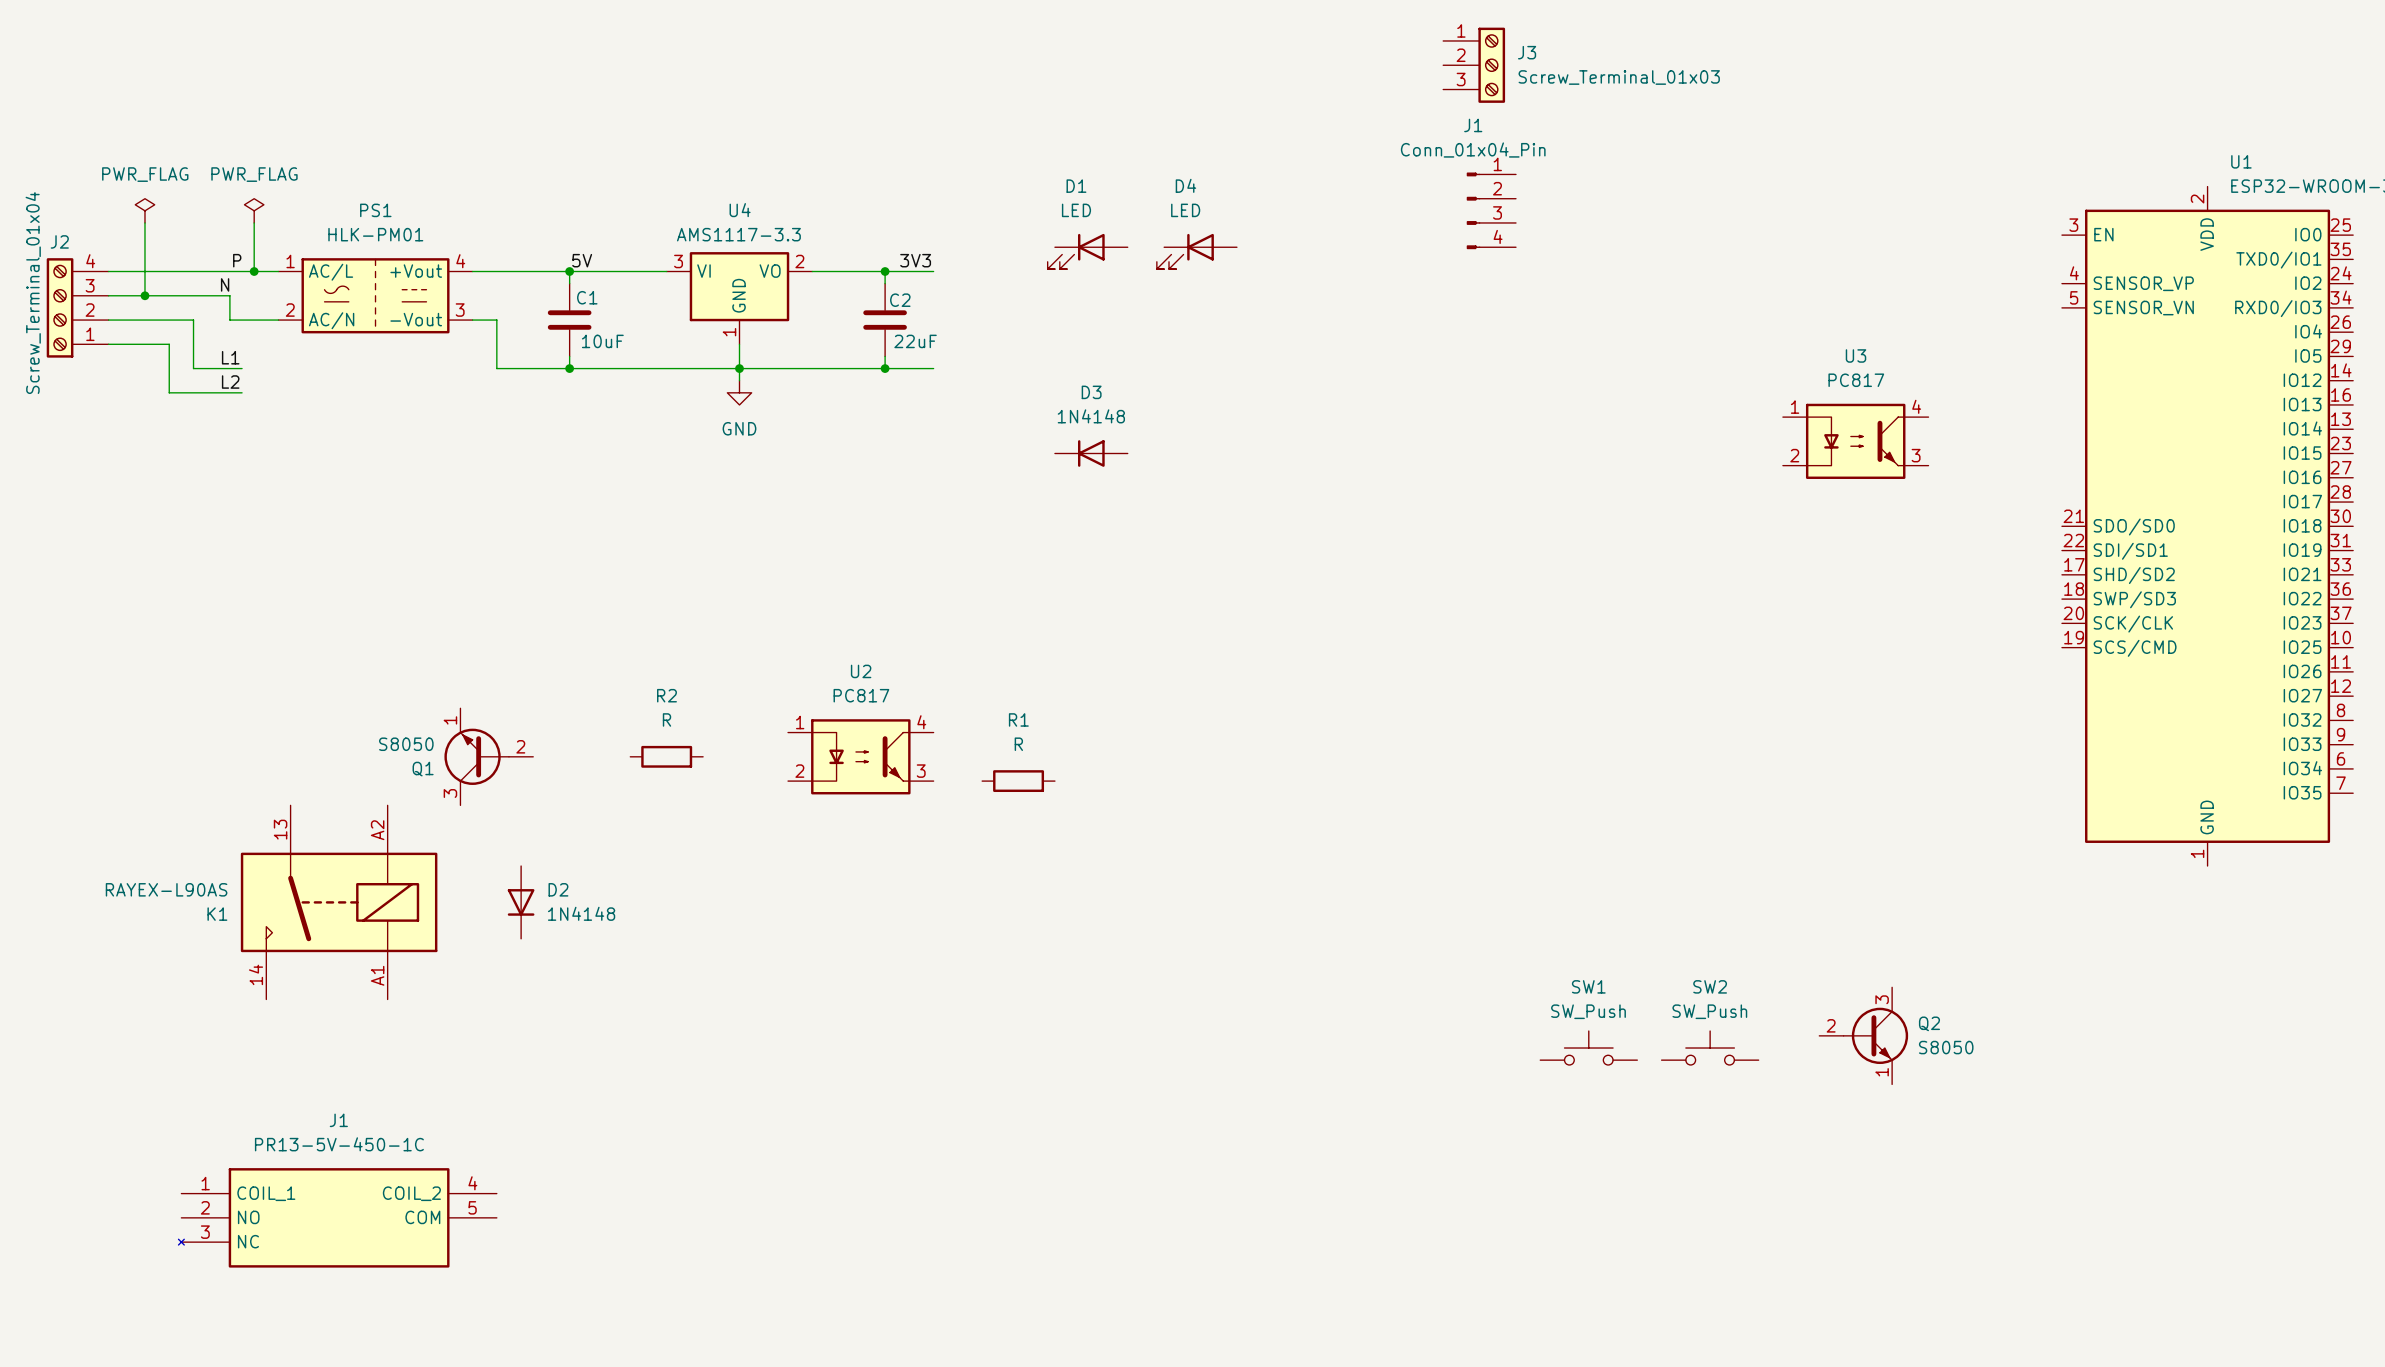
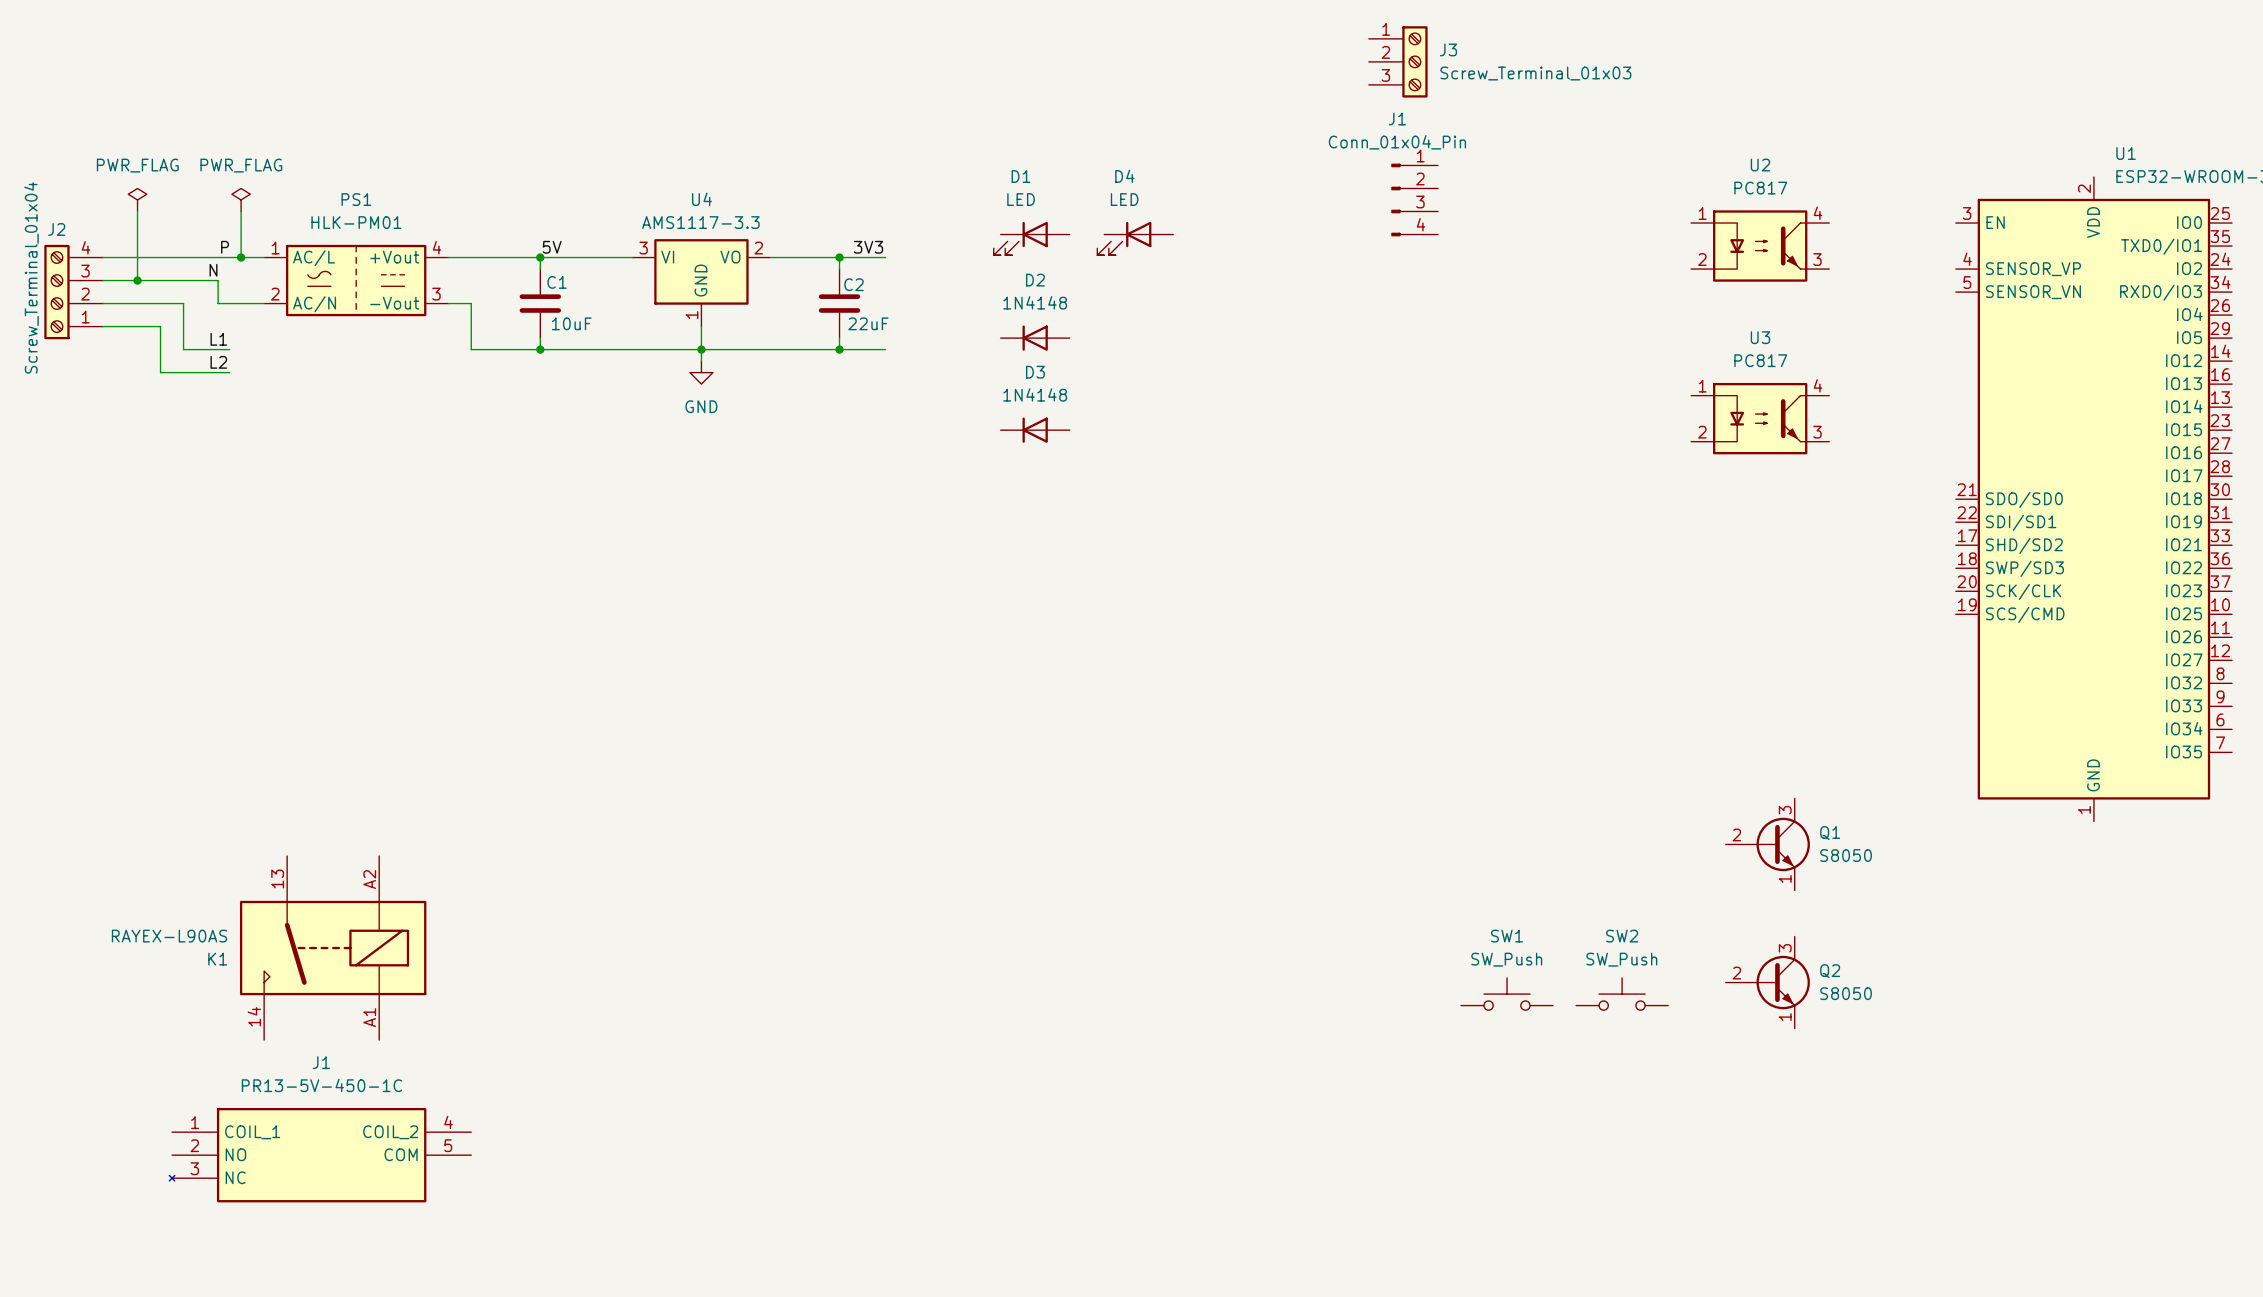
Q1 rotation: 0° (476, 756) -> 180° (1779, 844)
Q1 position: (488, 756) -> (1767, 844)
R2: R (666, 756) -> none
U2 position: (860, 756) -> (1760, 246)
R1: R (1018, 781) -> none
D2 name position: D2 (558, 889) -> D2 (1035, 280)
K1 position: (339, 902) -> (333, 948)
D2 rotation: 0° (521, 902) -> 90° clockwise (1035, 338)
D2 position: (521, 902) -> (1035, 338)
D2 value position: 1N4148 (581, 913) -> 1N4148 (1035, 302)

